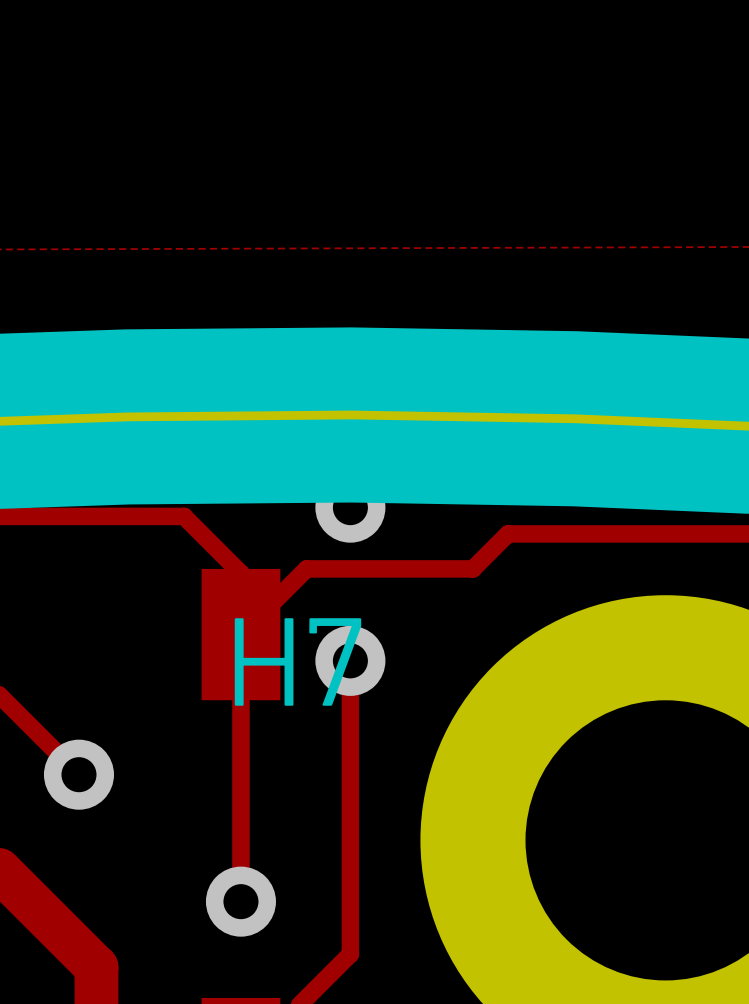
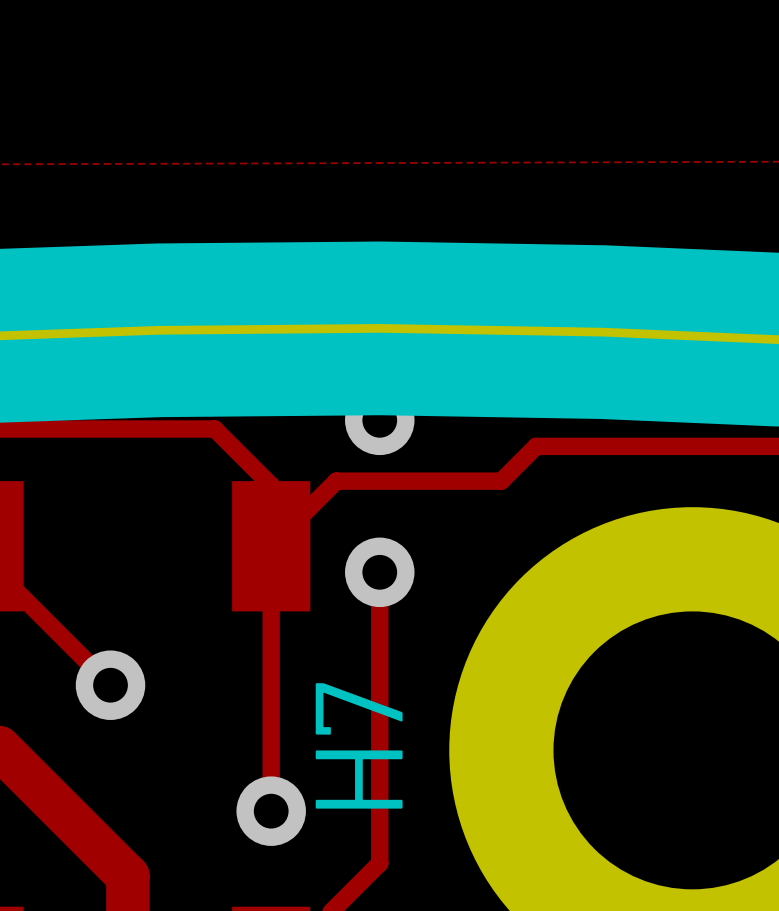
H7 name rotation: 0° (297, 661) -> 90° counterclockwise (359, 745)

